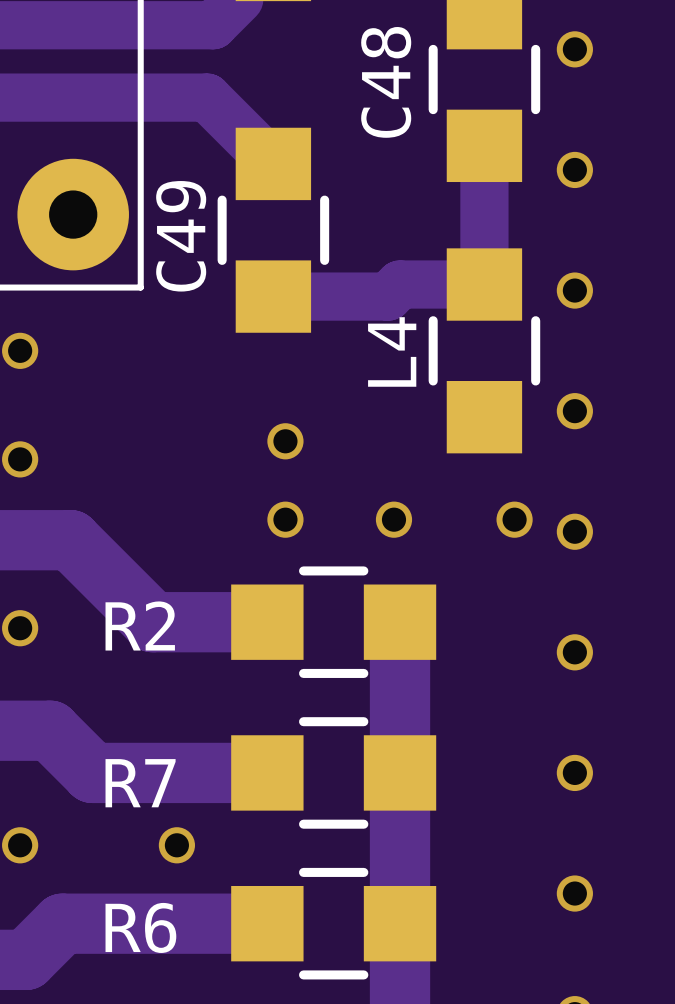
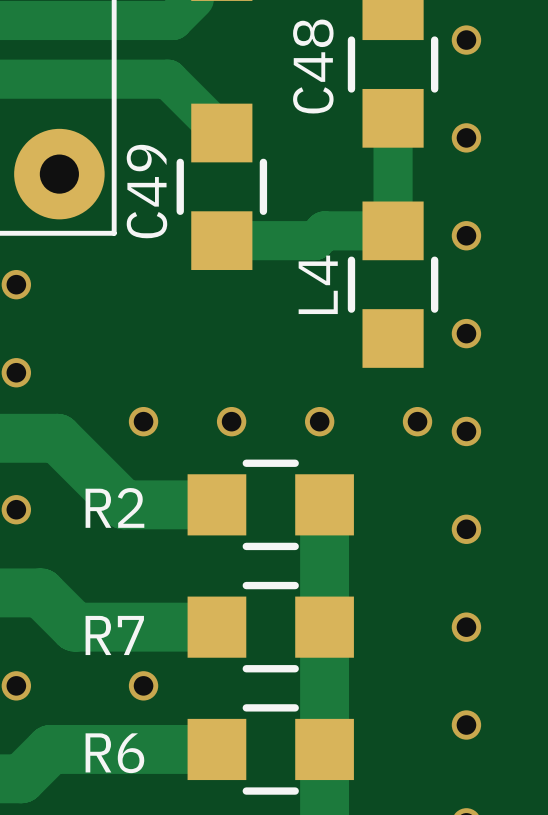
via position: (285, 441) -> (143, 421)

